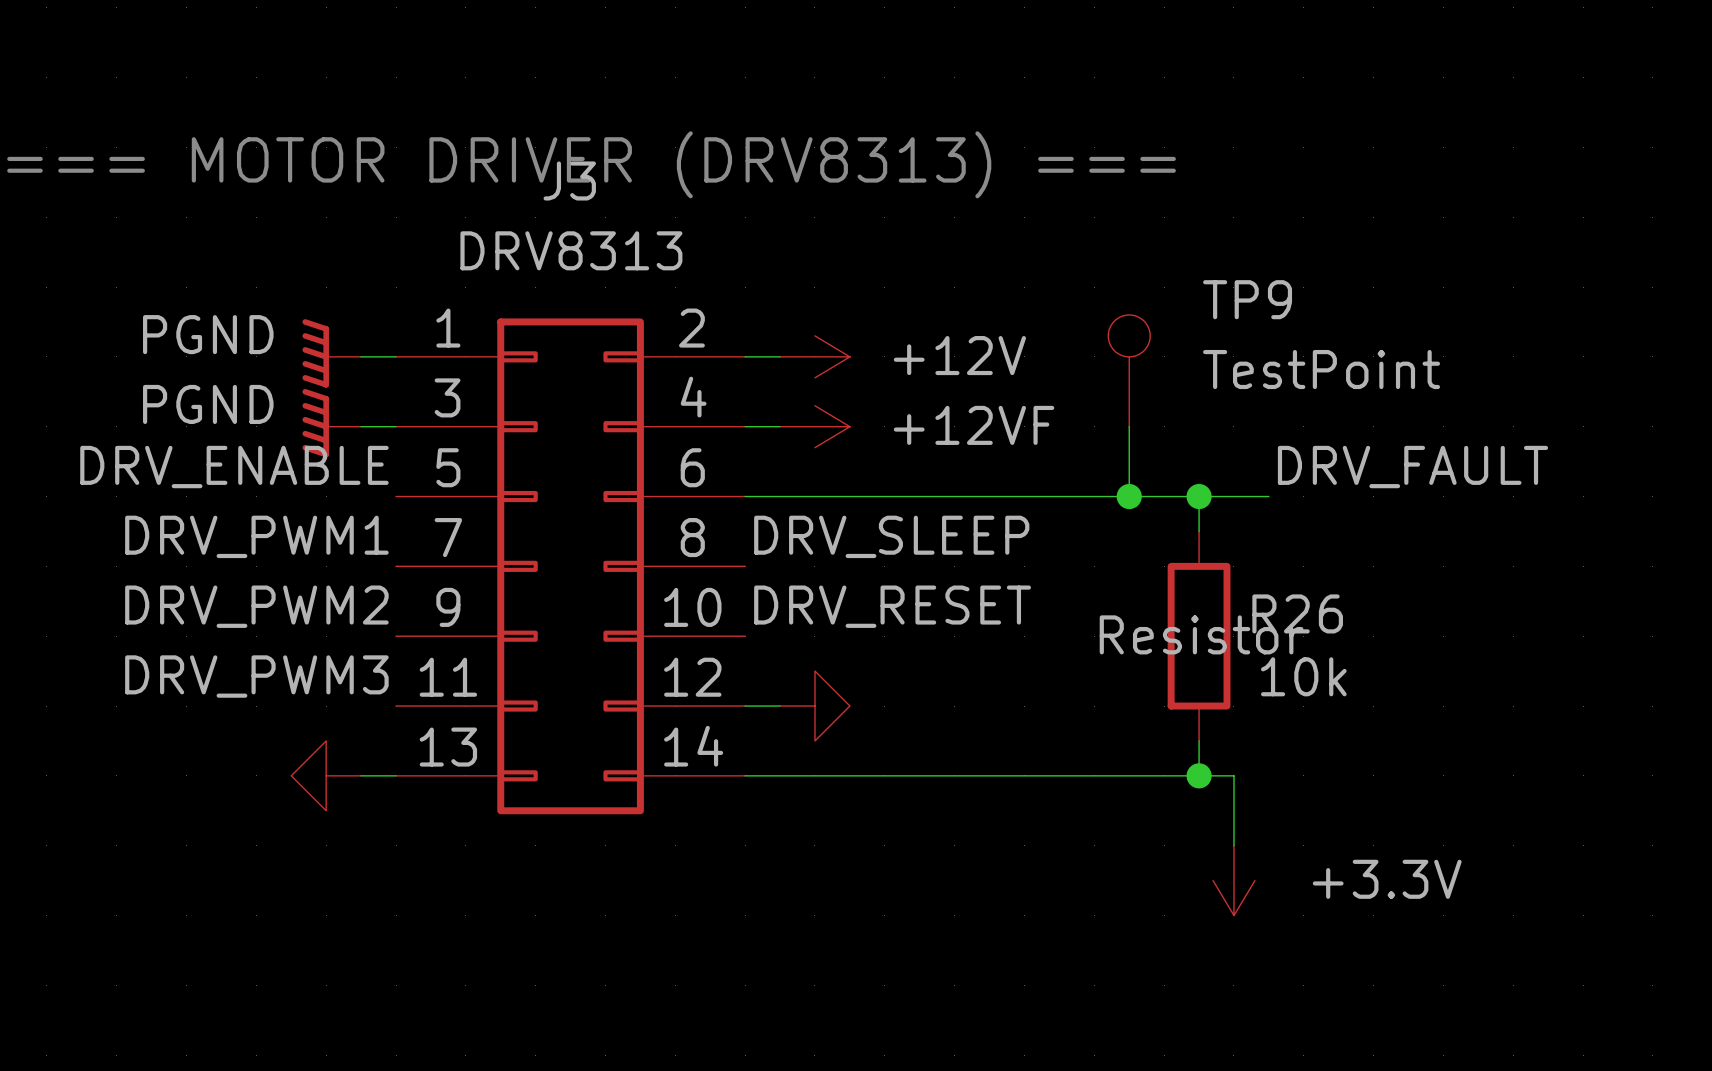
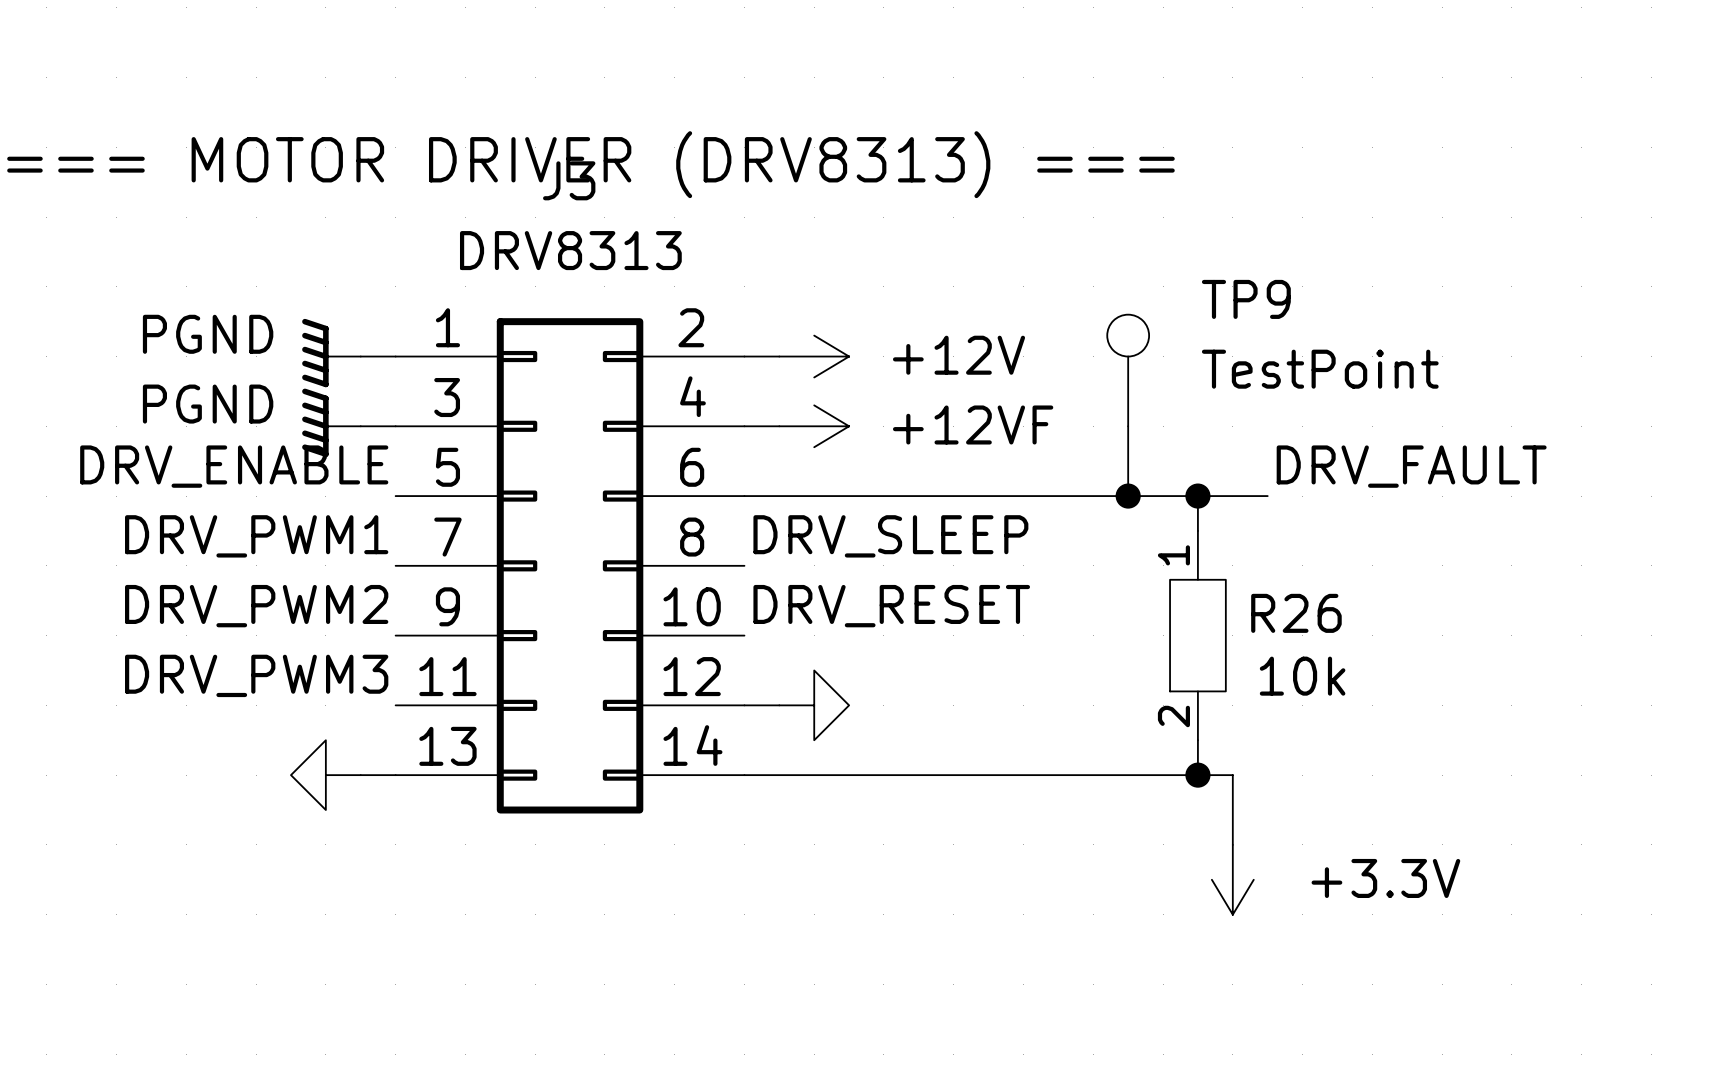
R26 symbol: [1167, 531, 1231, 741] -> [1170, 530, 1226, 741]
R26 text: Resistor (1201, 634) -> none

